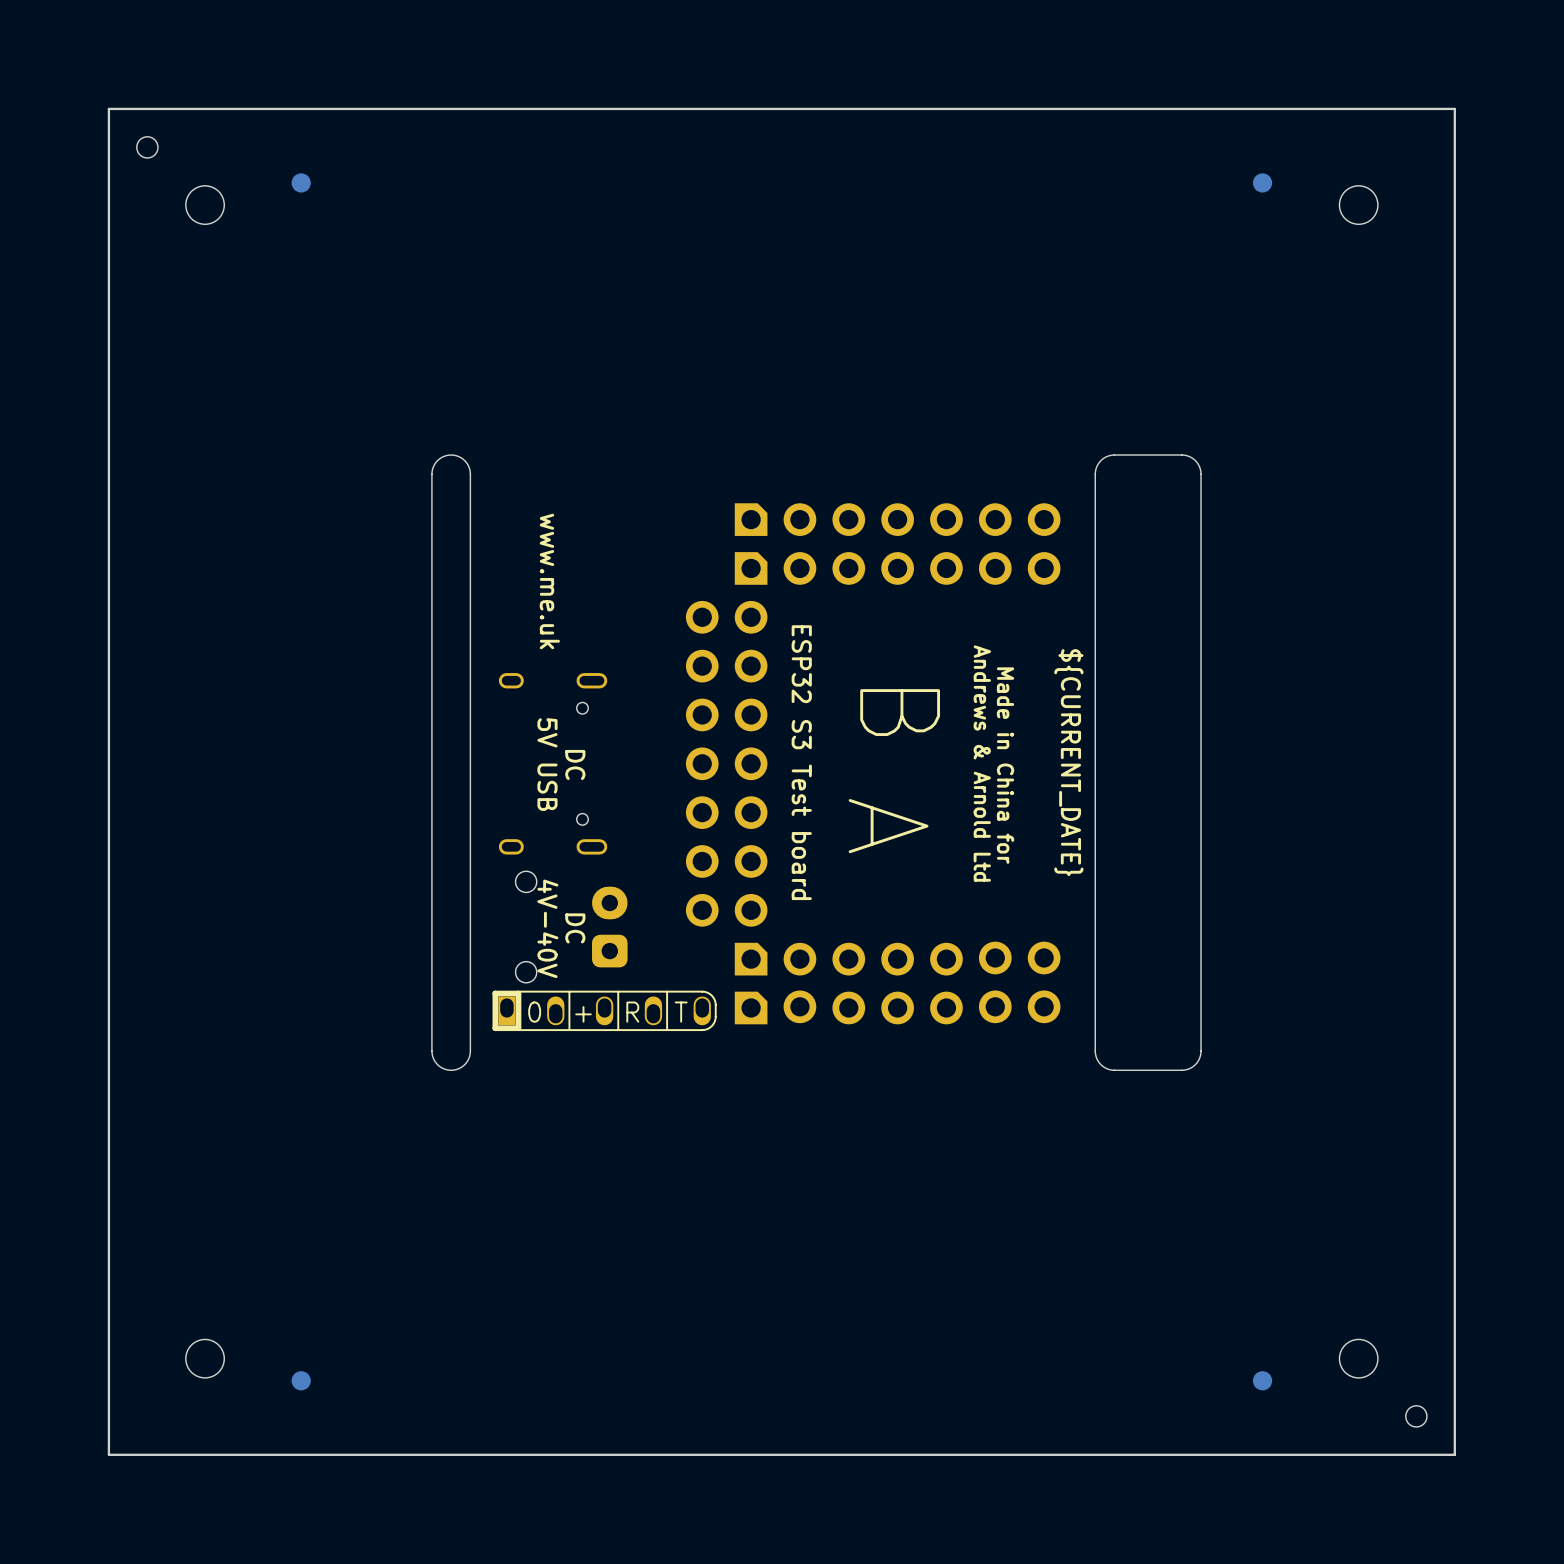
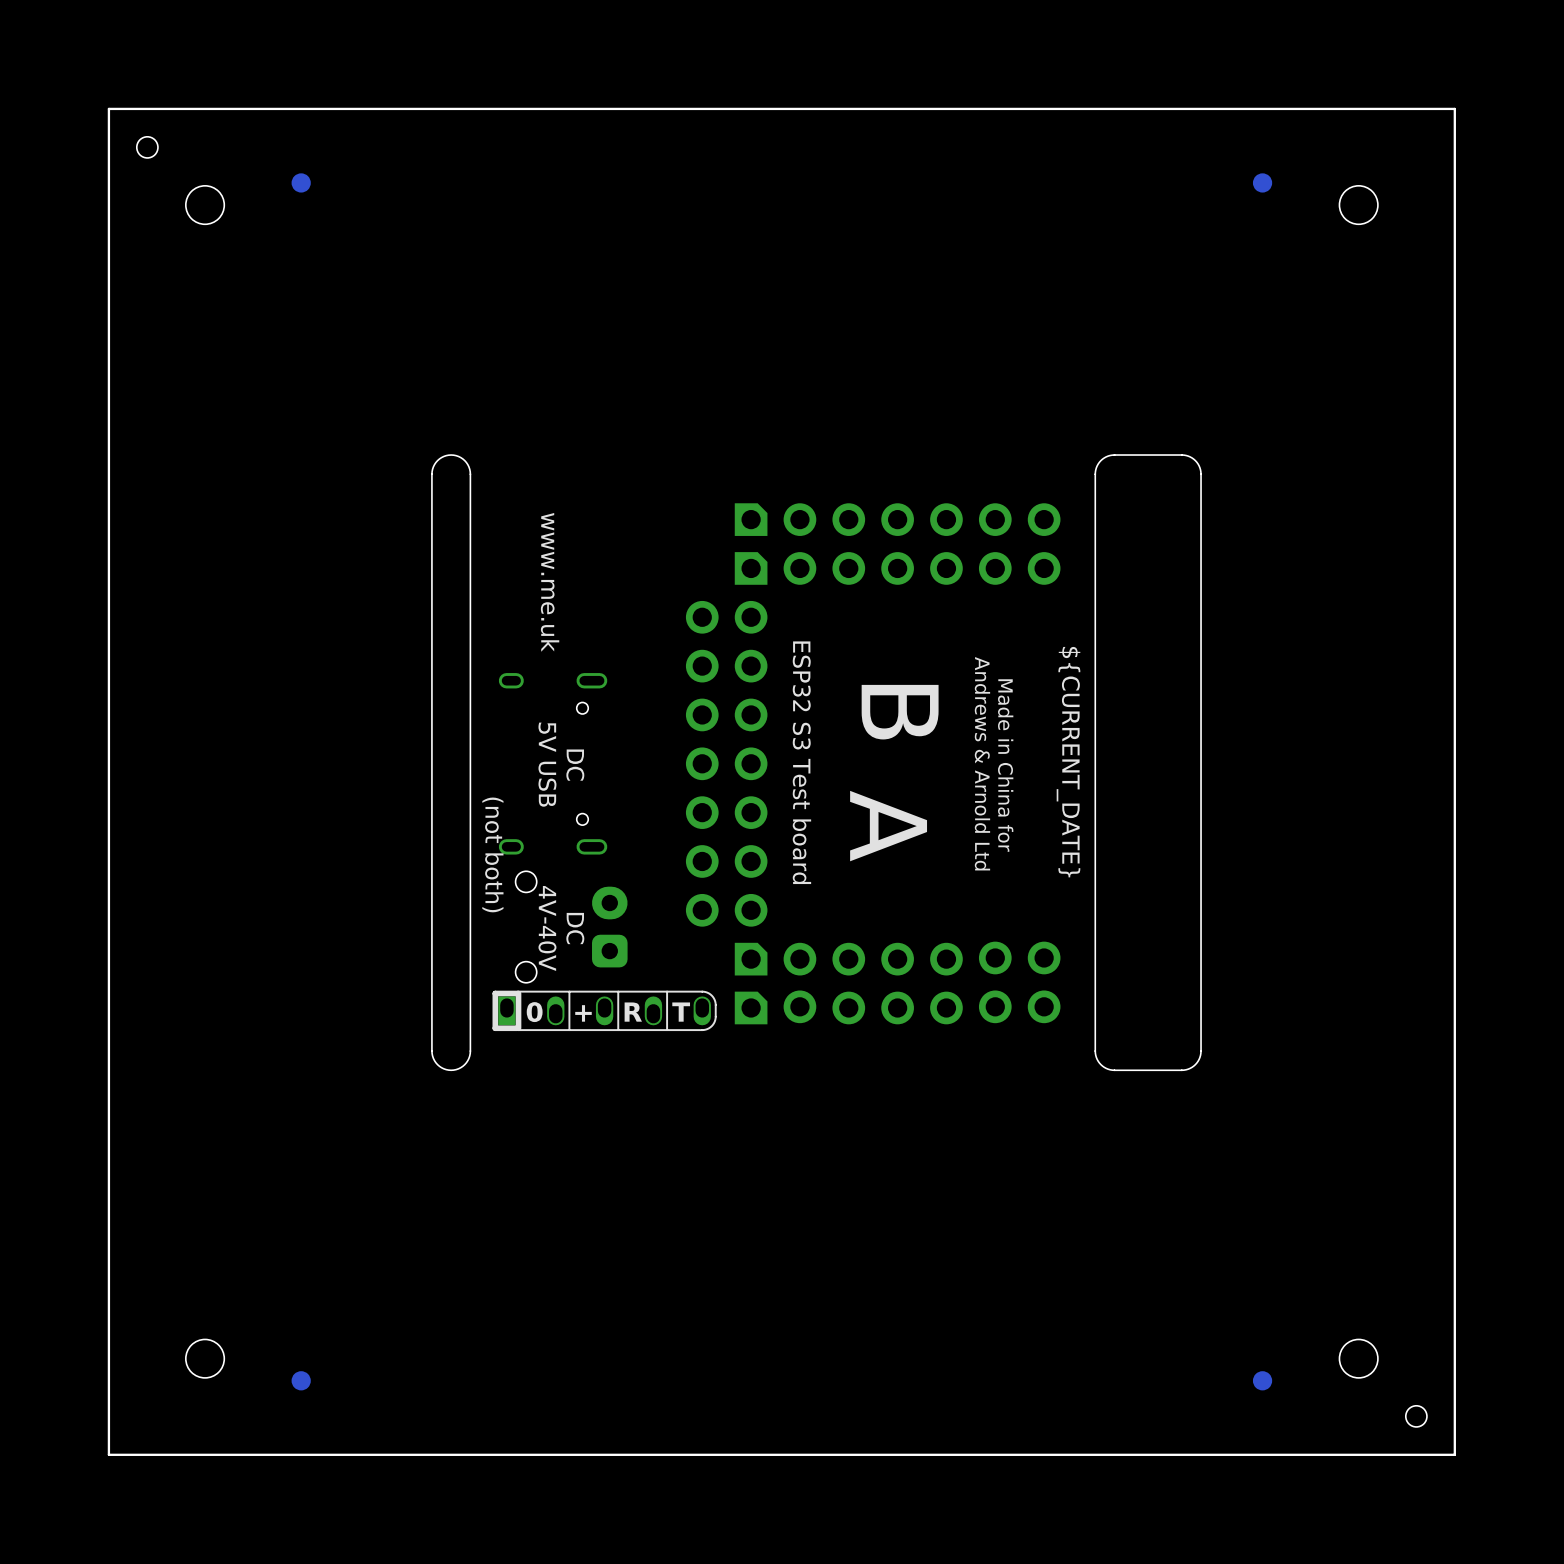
text: none -> (not both) (492, 854)

